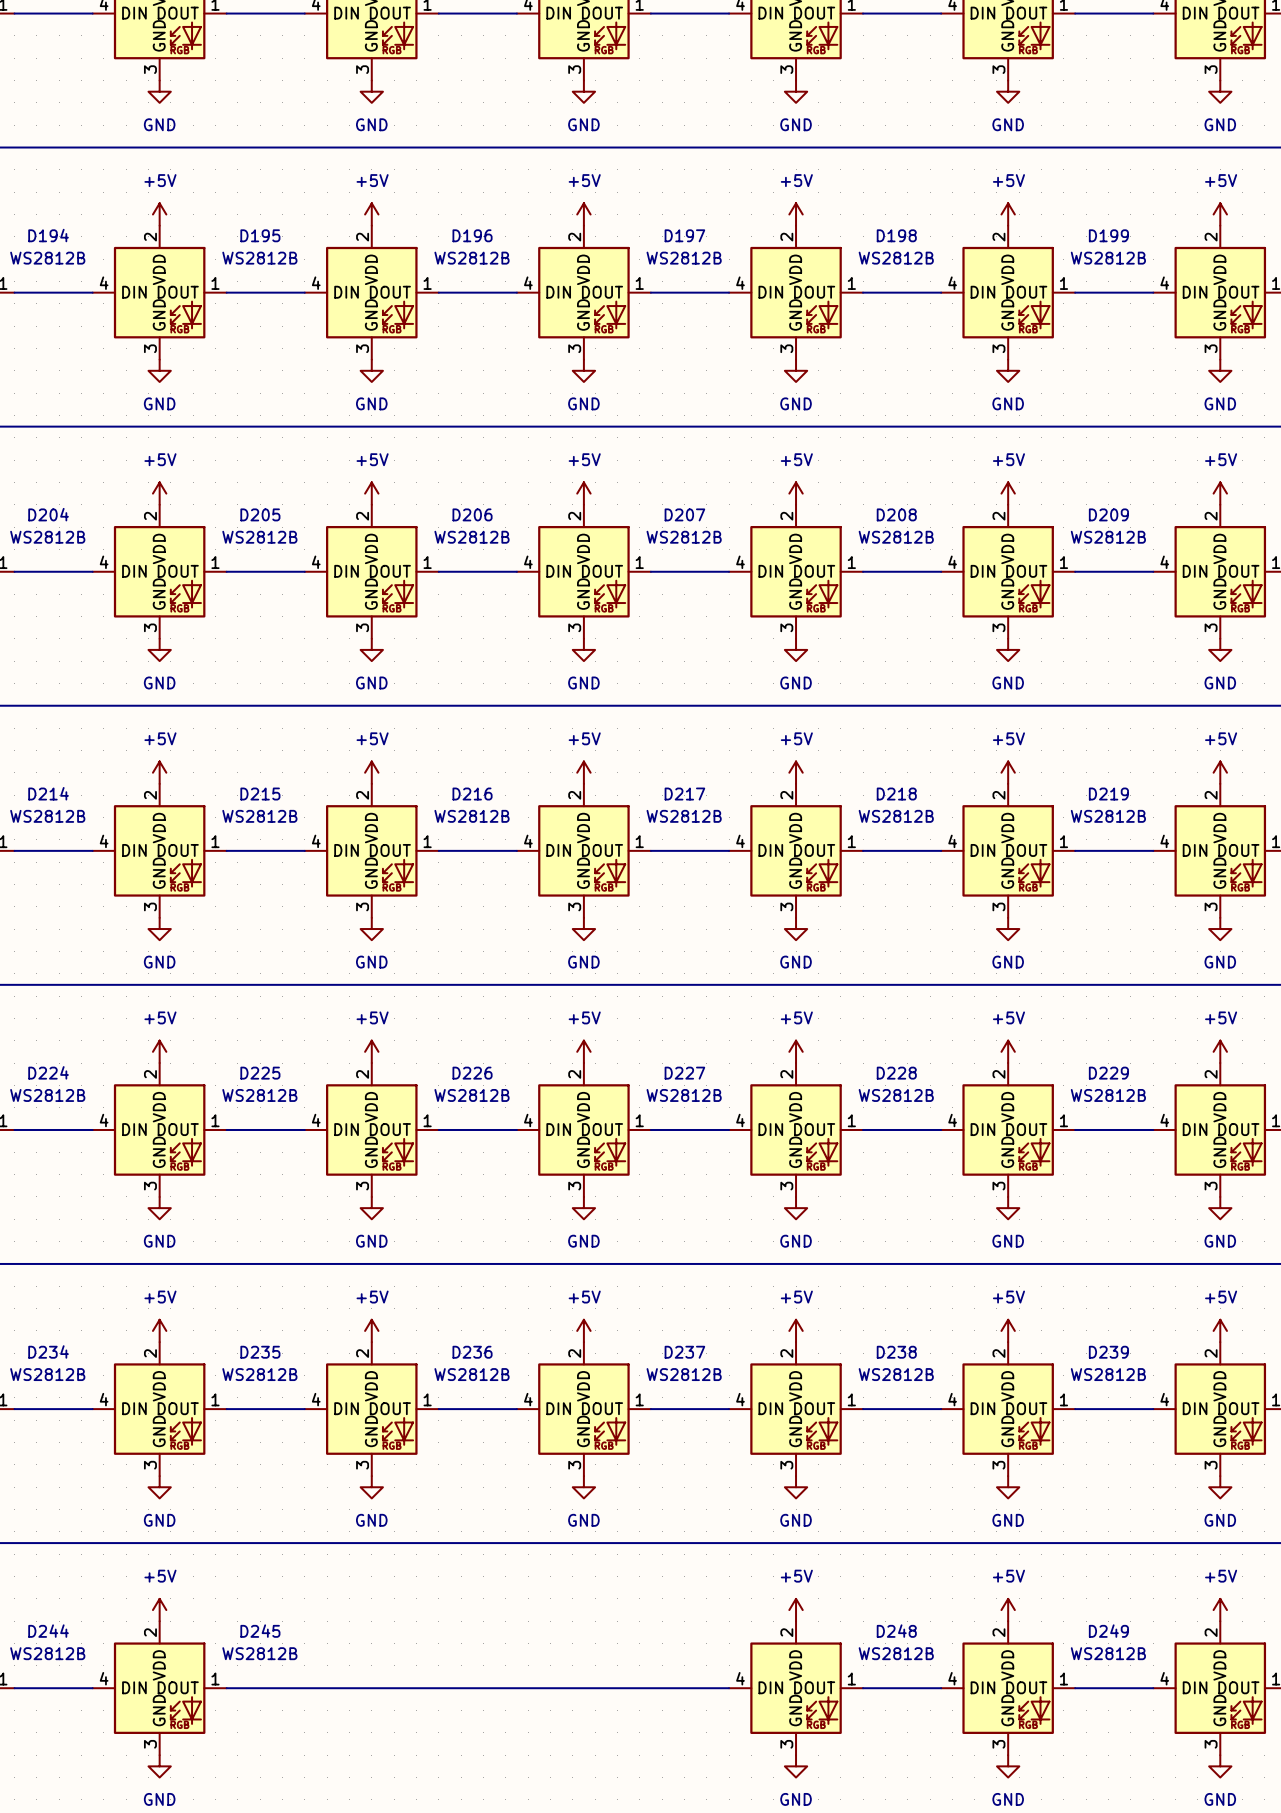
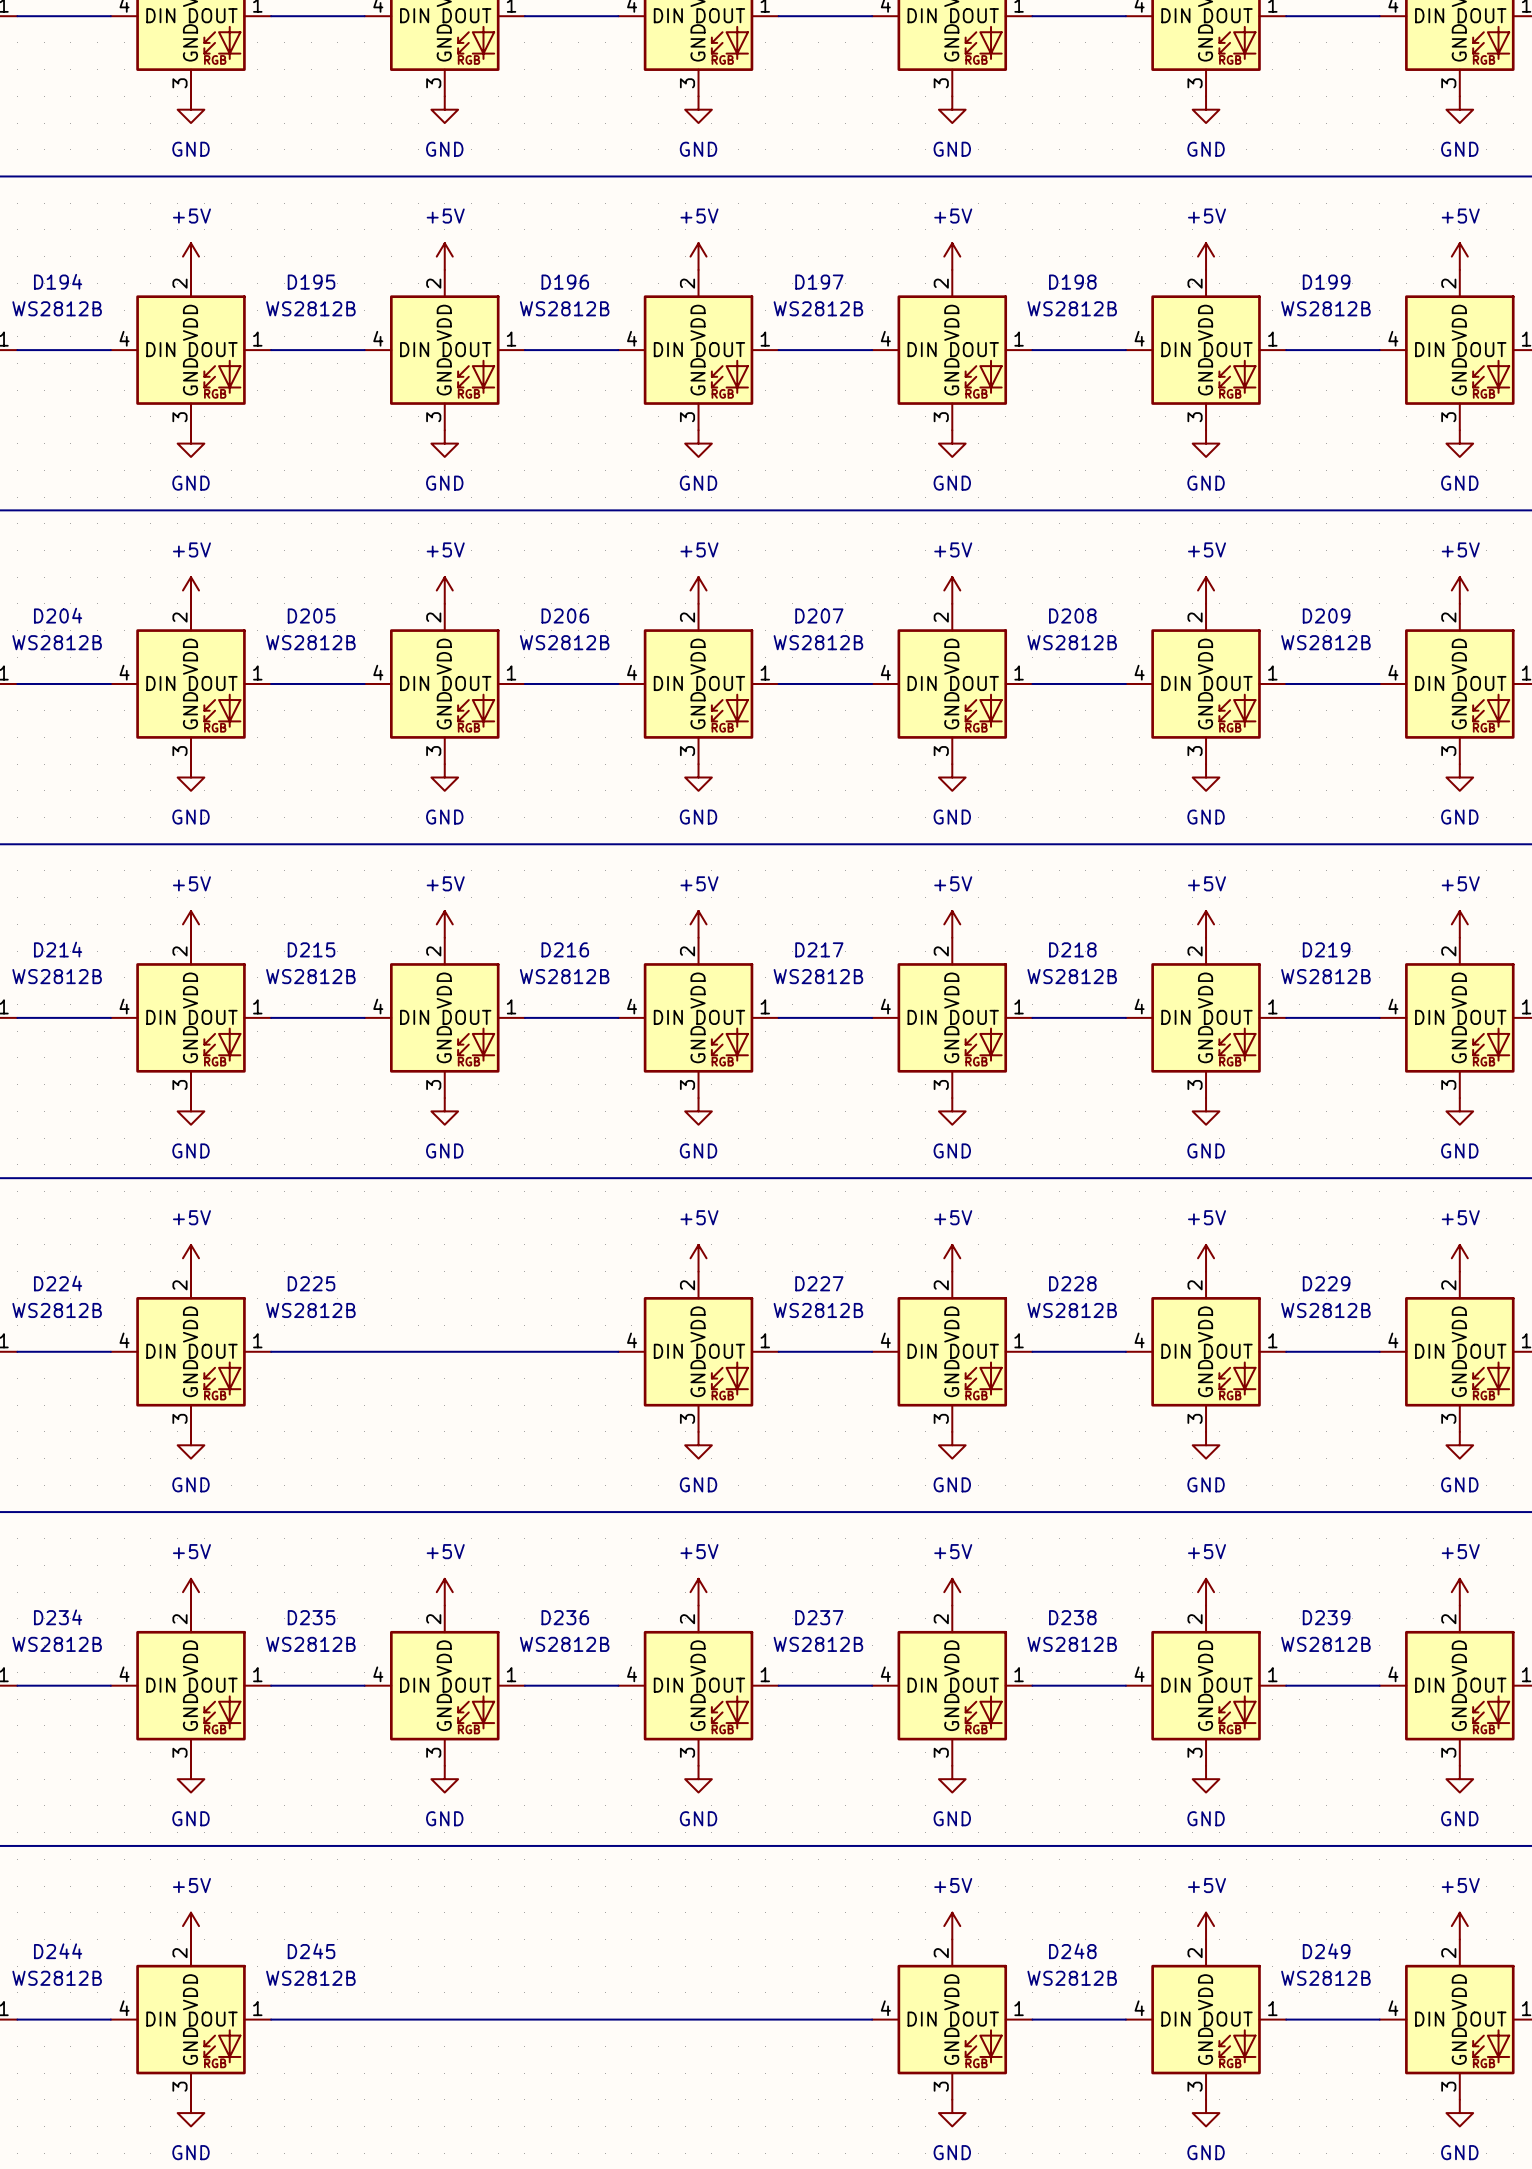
power symbol: +5V (371, 1051) -> none
D226: WS2812B (371, 1129) -> none
power symbol: GND (371, 1208) -> none

